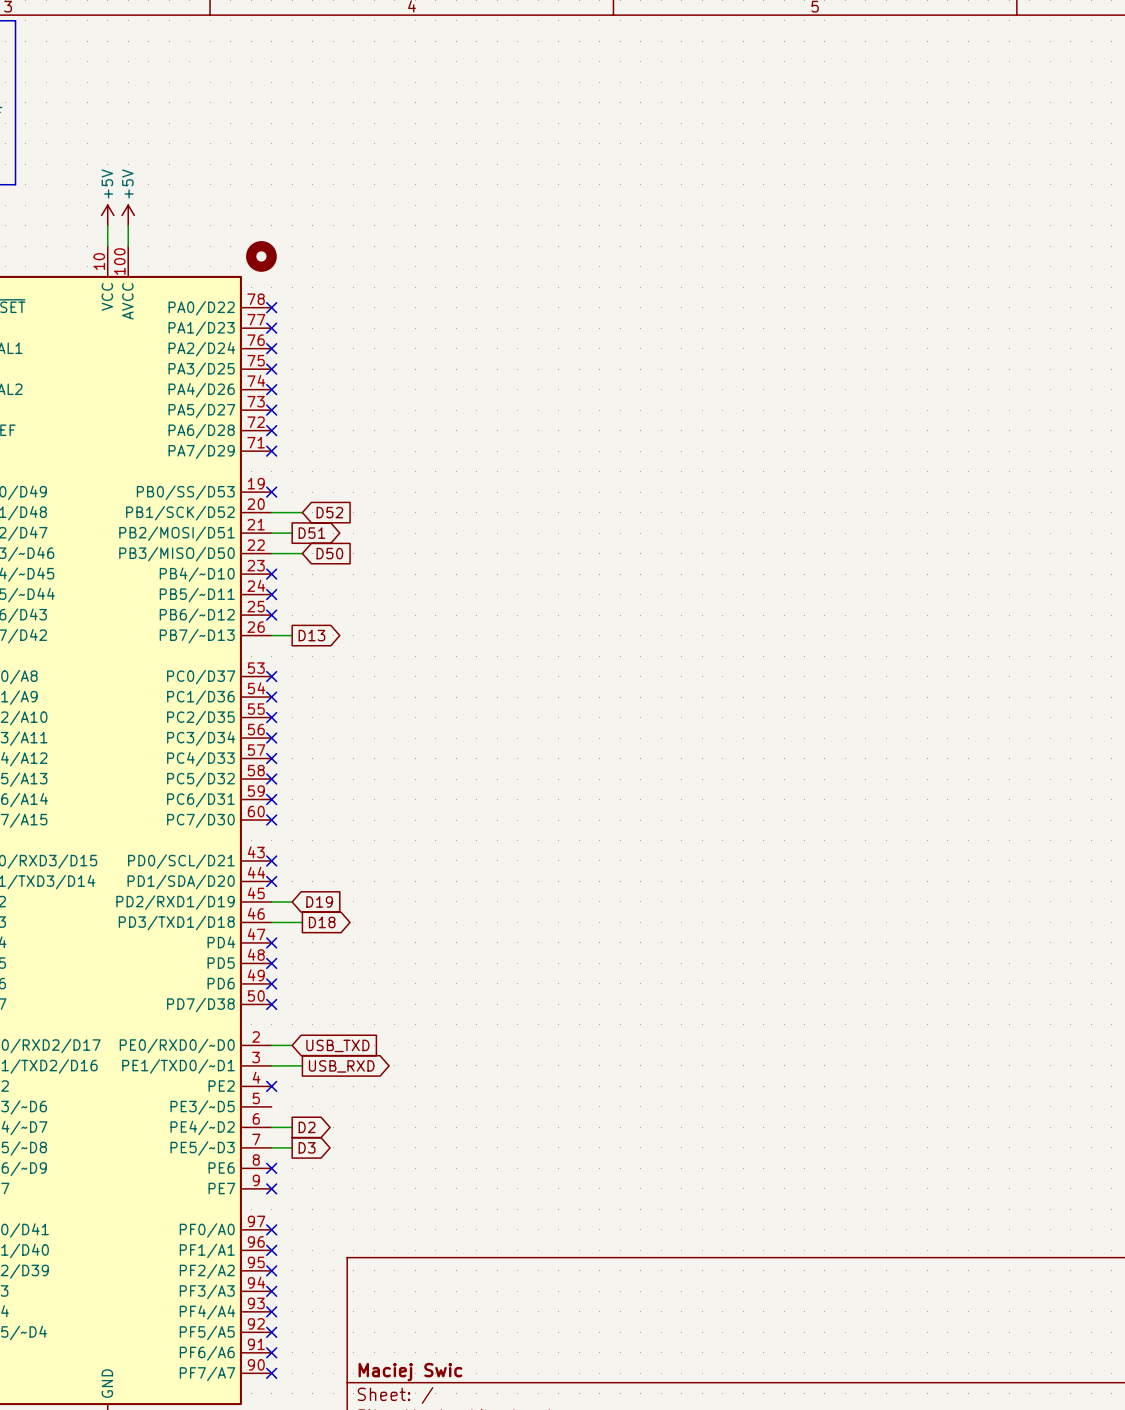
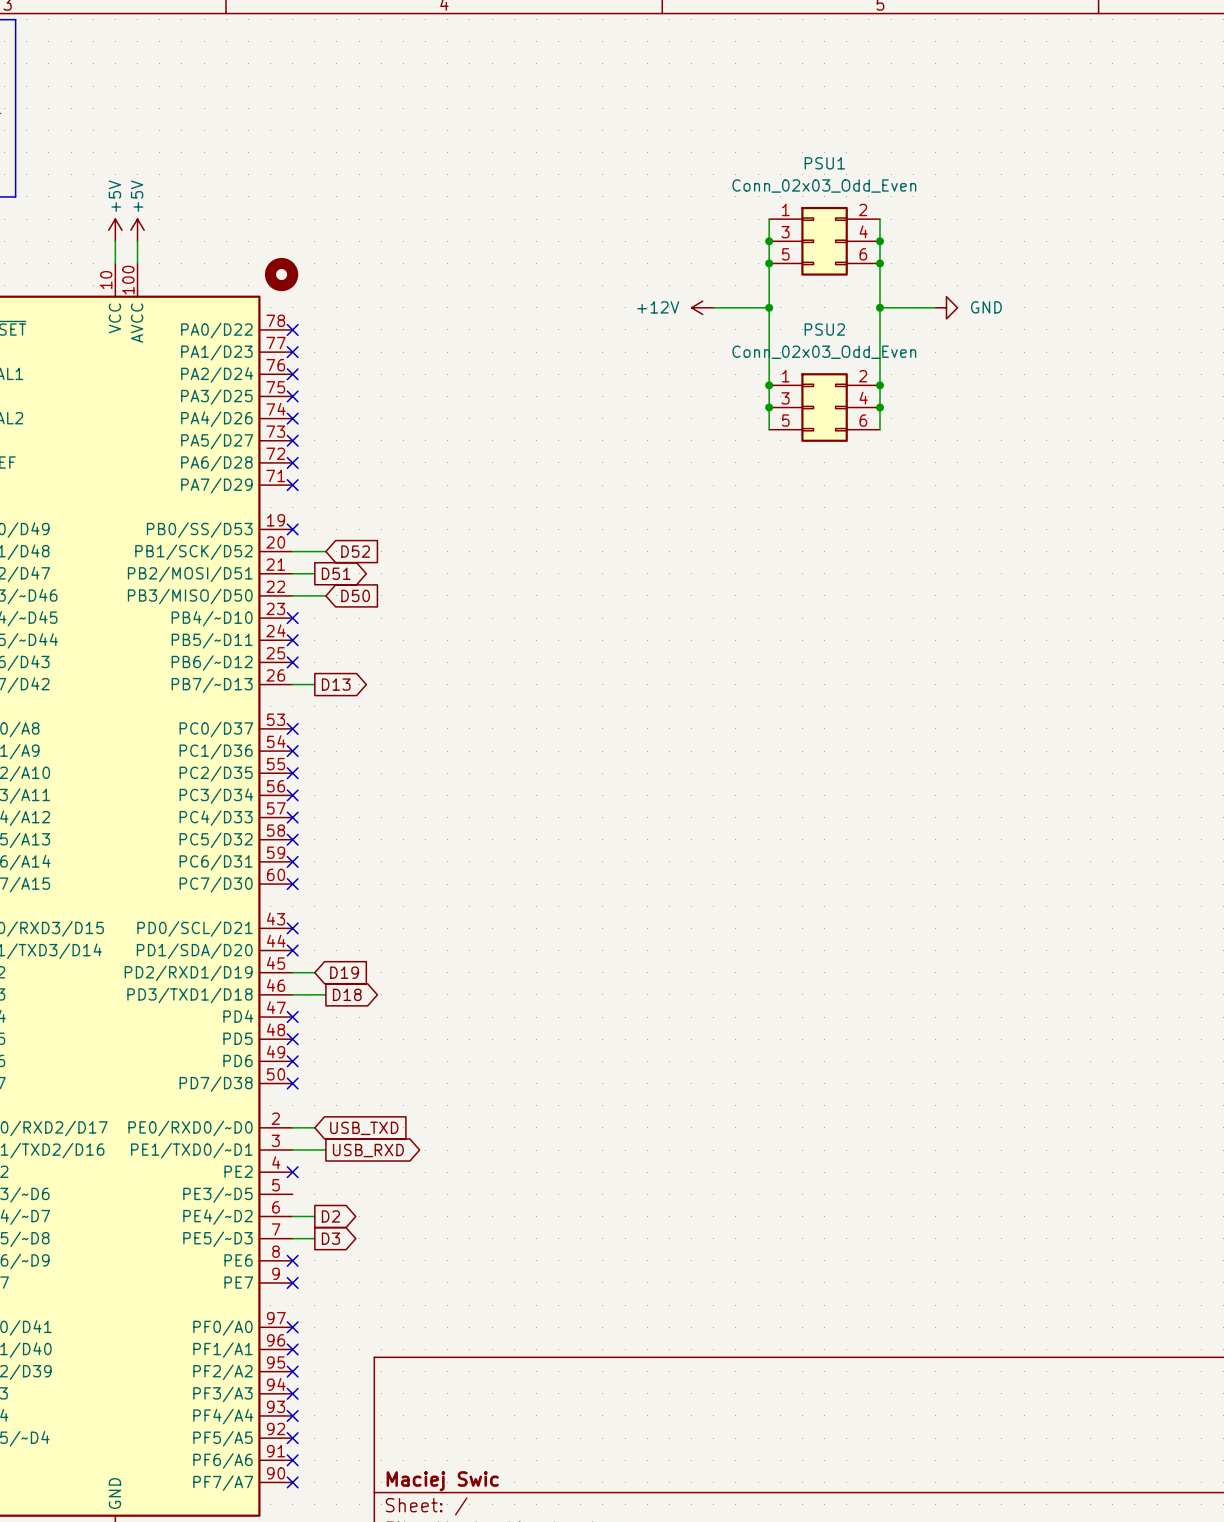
wire: none -> (769, 219) (769, 429)
wire: none -> (879, 219) (879, 429)
junction: none -> (769, 241)
PSU1: none -> Conn_02x03_Odd_Even (824, 241)
junction: none -> (879, 241)
junction: none -> (769, 263)
junction: none -> (879, 263)
power symbol: none -> +12V (702, 307)
wire: none -> (713, 307) (769, 307)
junction: none -> (769, 307)
wire: none -> (879, 307) (935, 307)
junction: none -> (879, 307)
power symbol: none -> GND (946, 307)
junction: none -> (769, 385)
junction: none -> (879, 385)
junction: none -> (769, 407)
PSU2: none -> Conn_02x03_Odd_Even (824, 407)
junction: none -> (879, 407)

